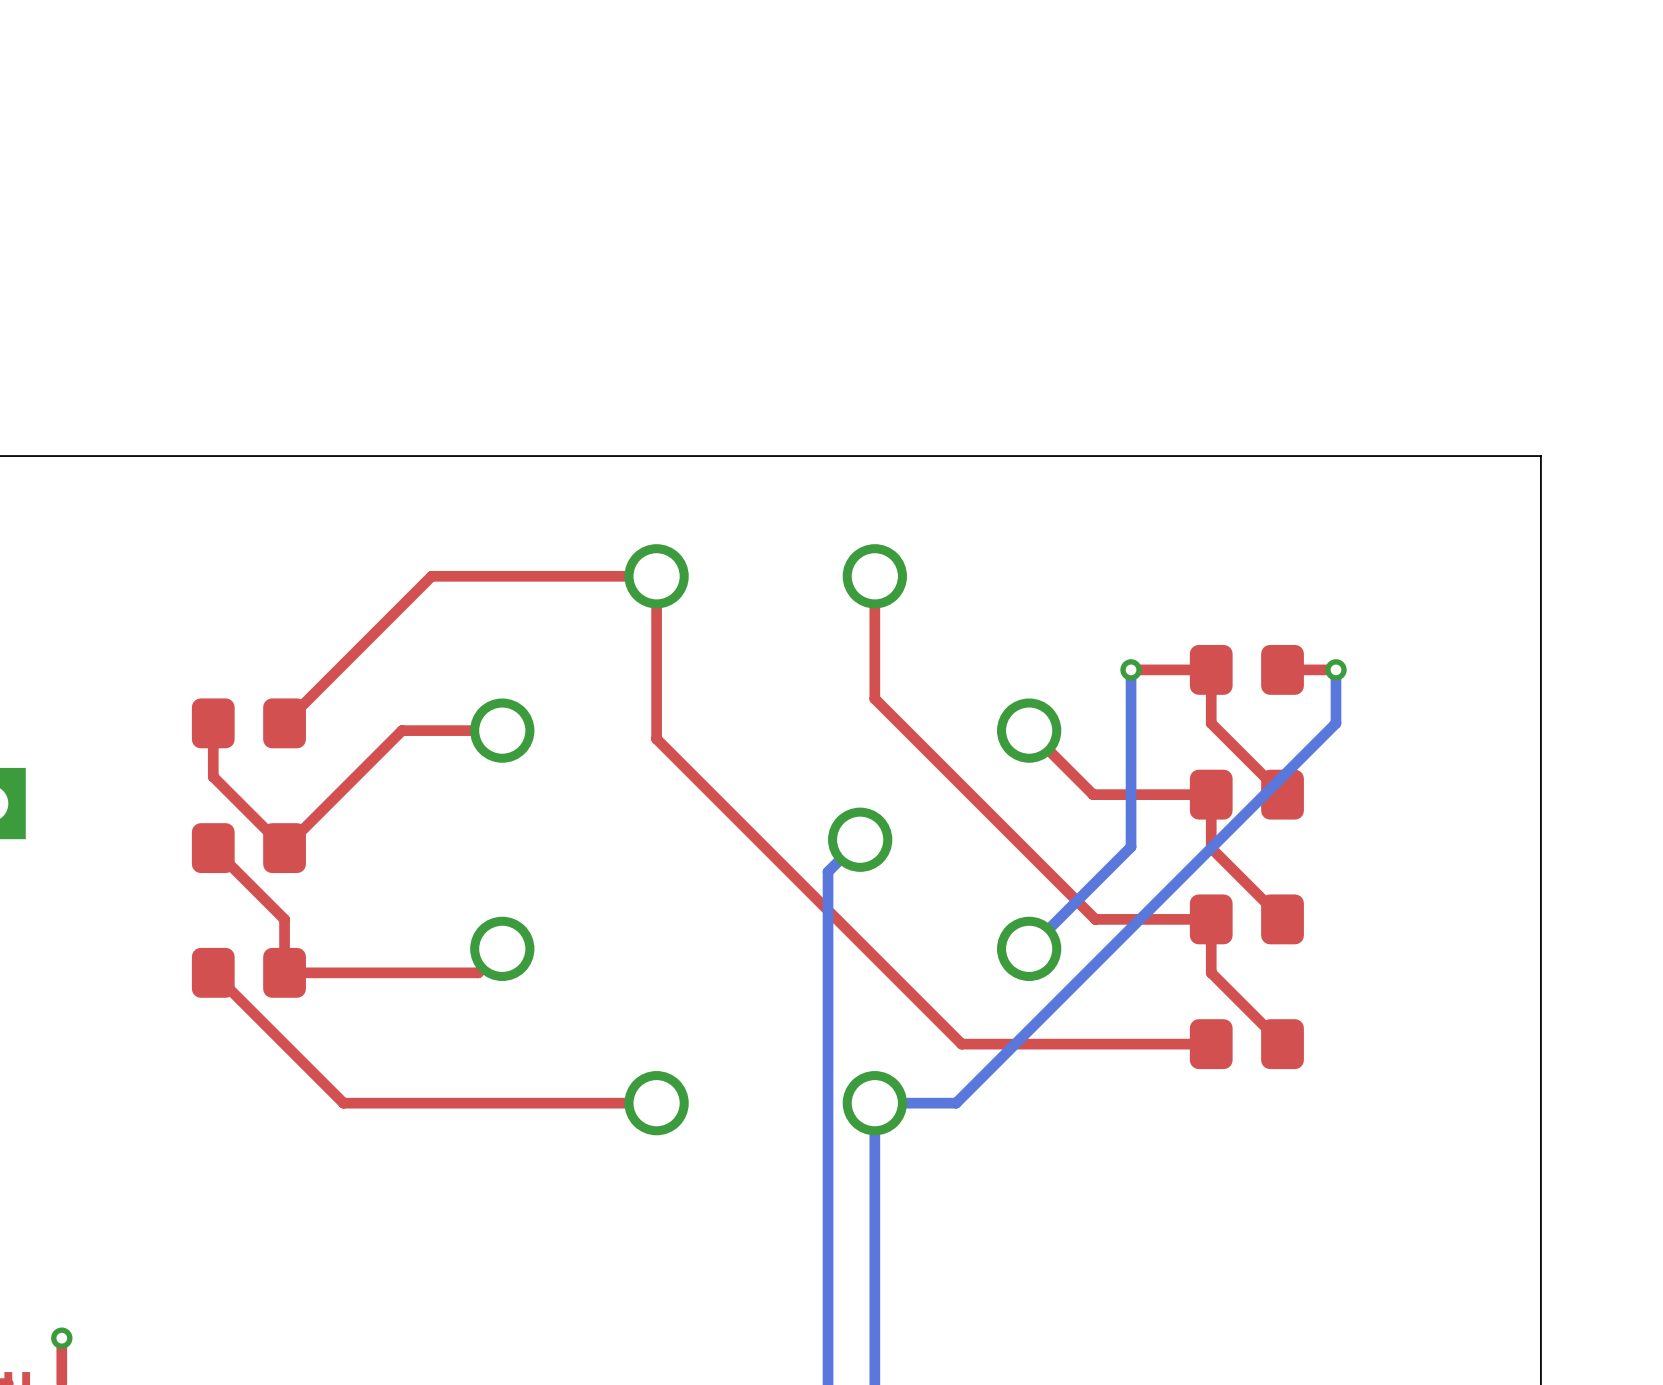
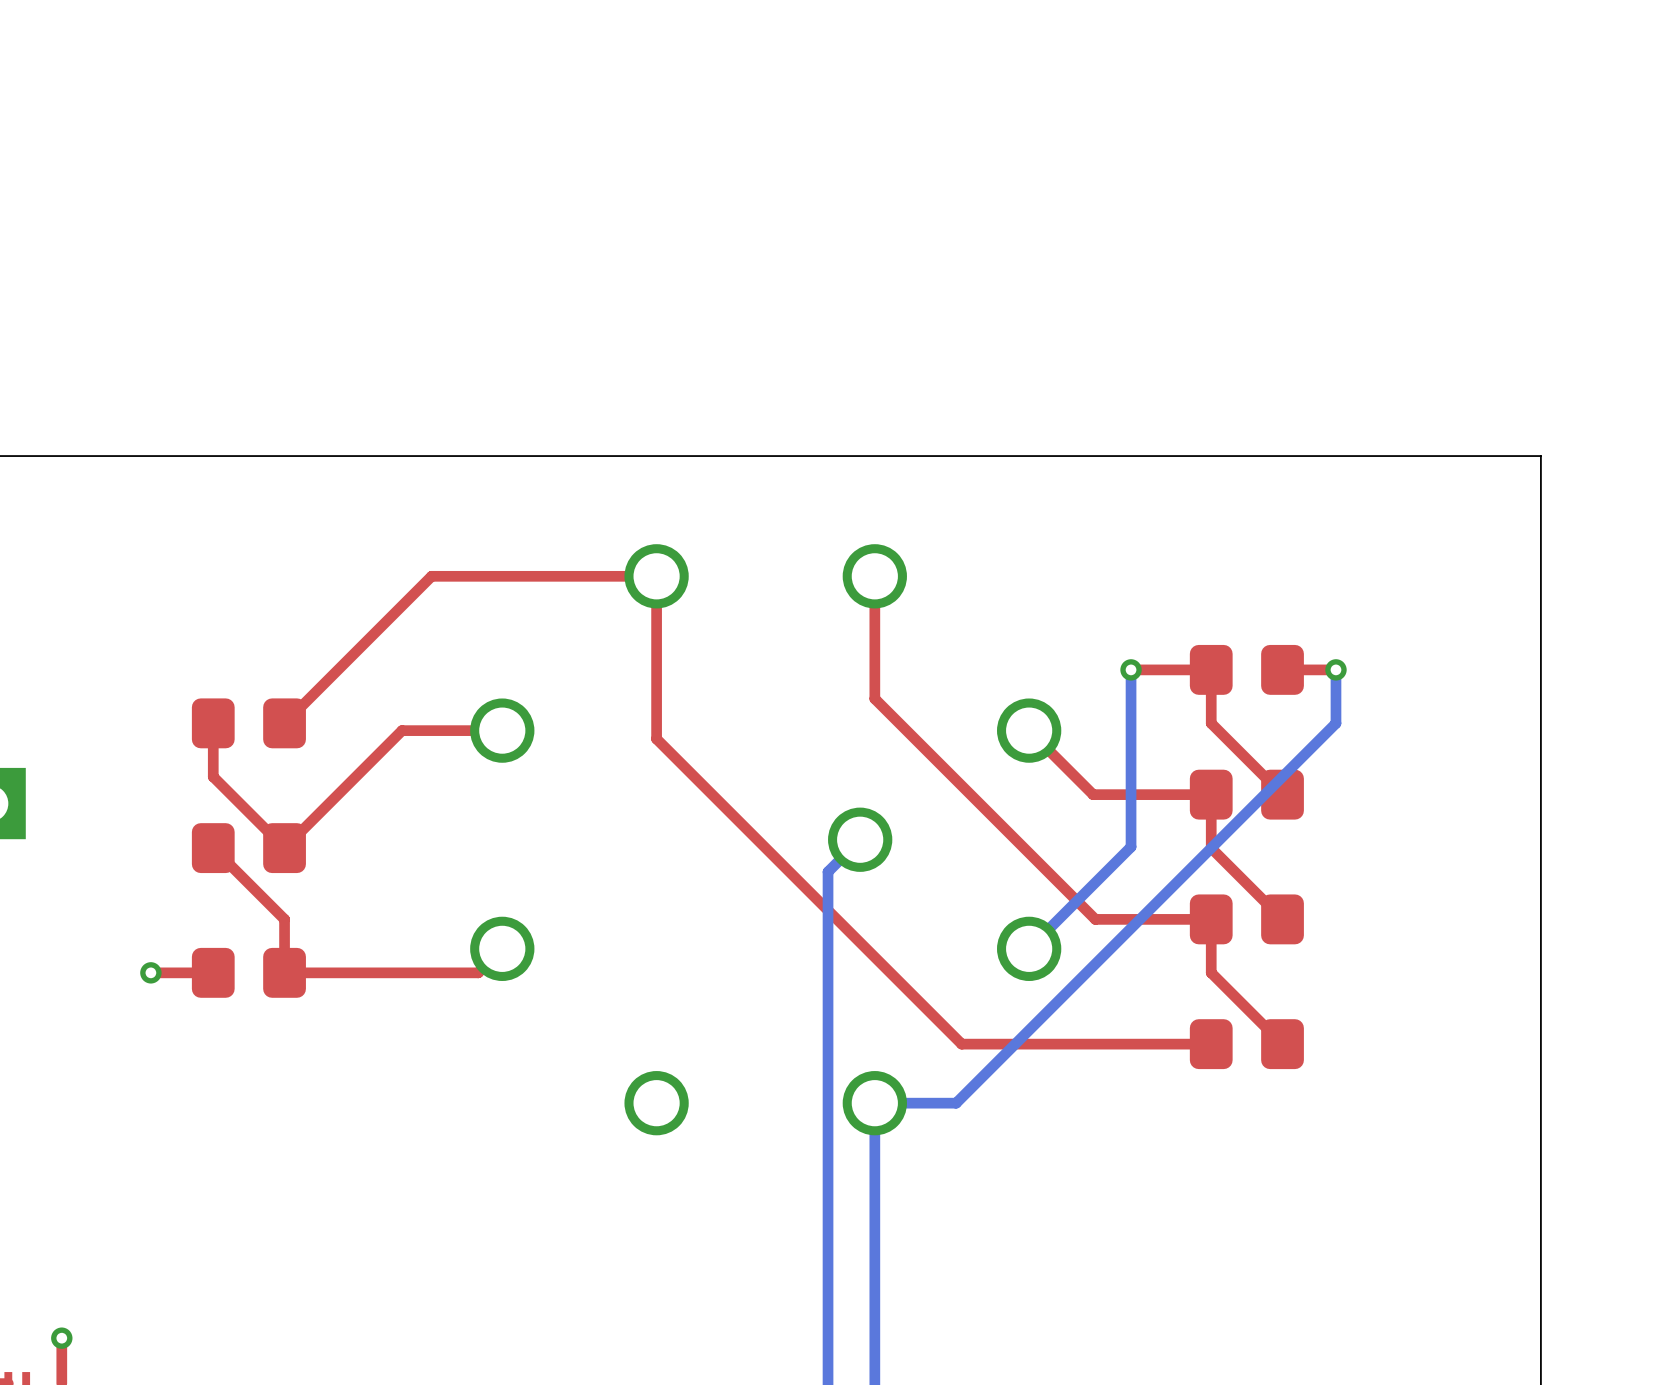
via: none -> (150, 972)
top track: (213, 972) (343, 1103) (656, 1103) -> (213, 972) (150, 972)

